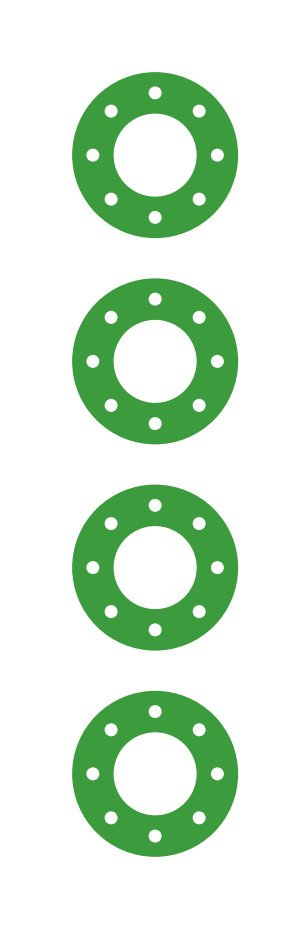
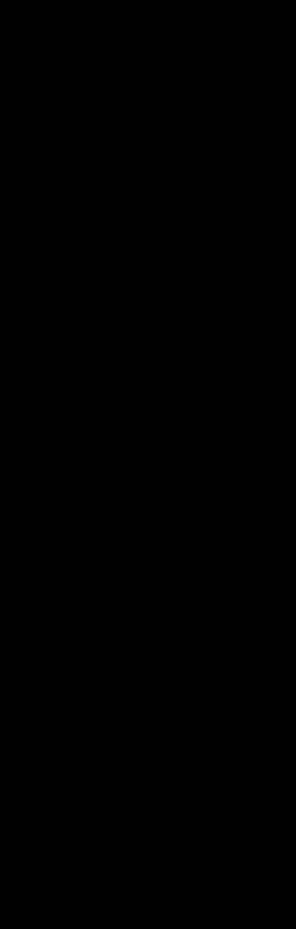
part: (155, 155) -> none
part: (155, 361) -> none
part: (155, 567) -> none
part: (155, 773) -> none

